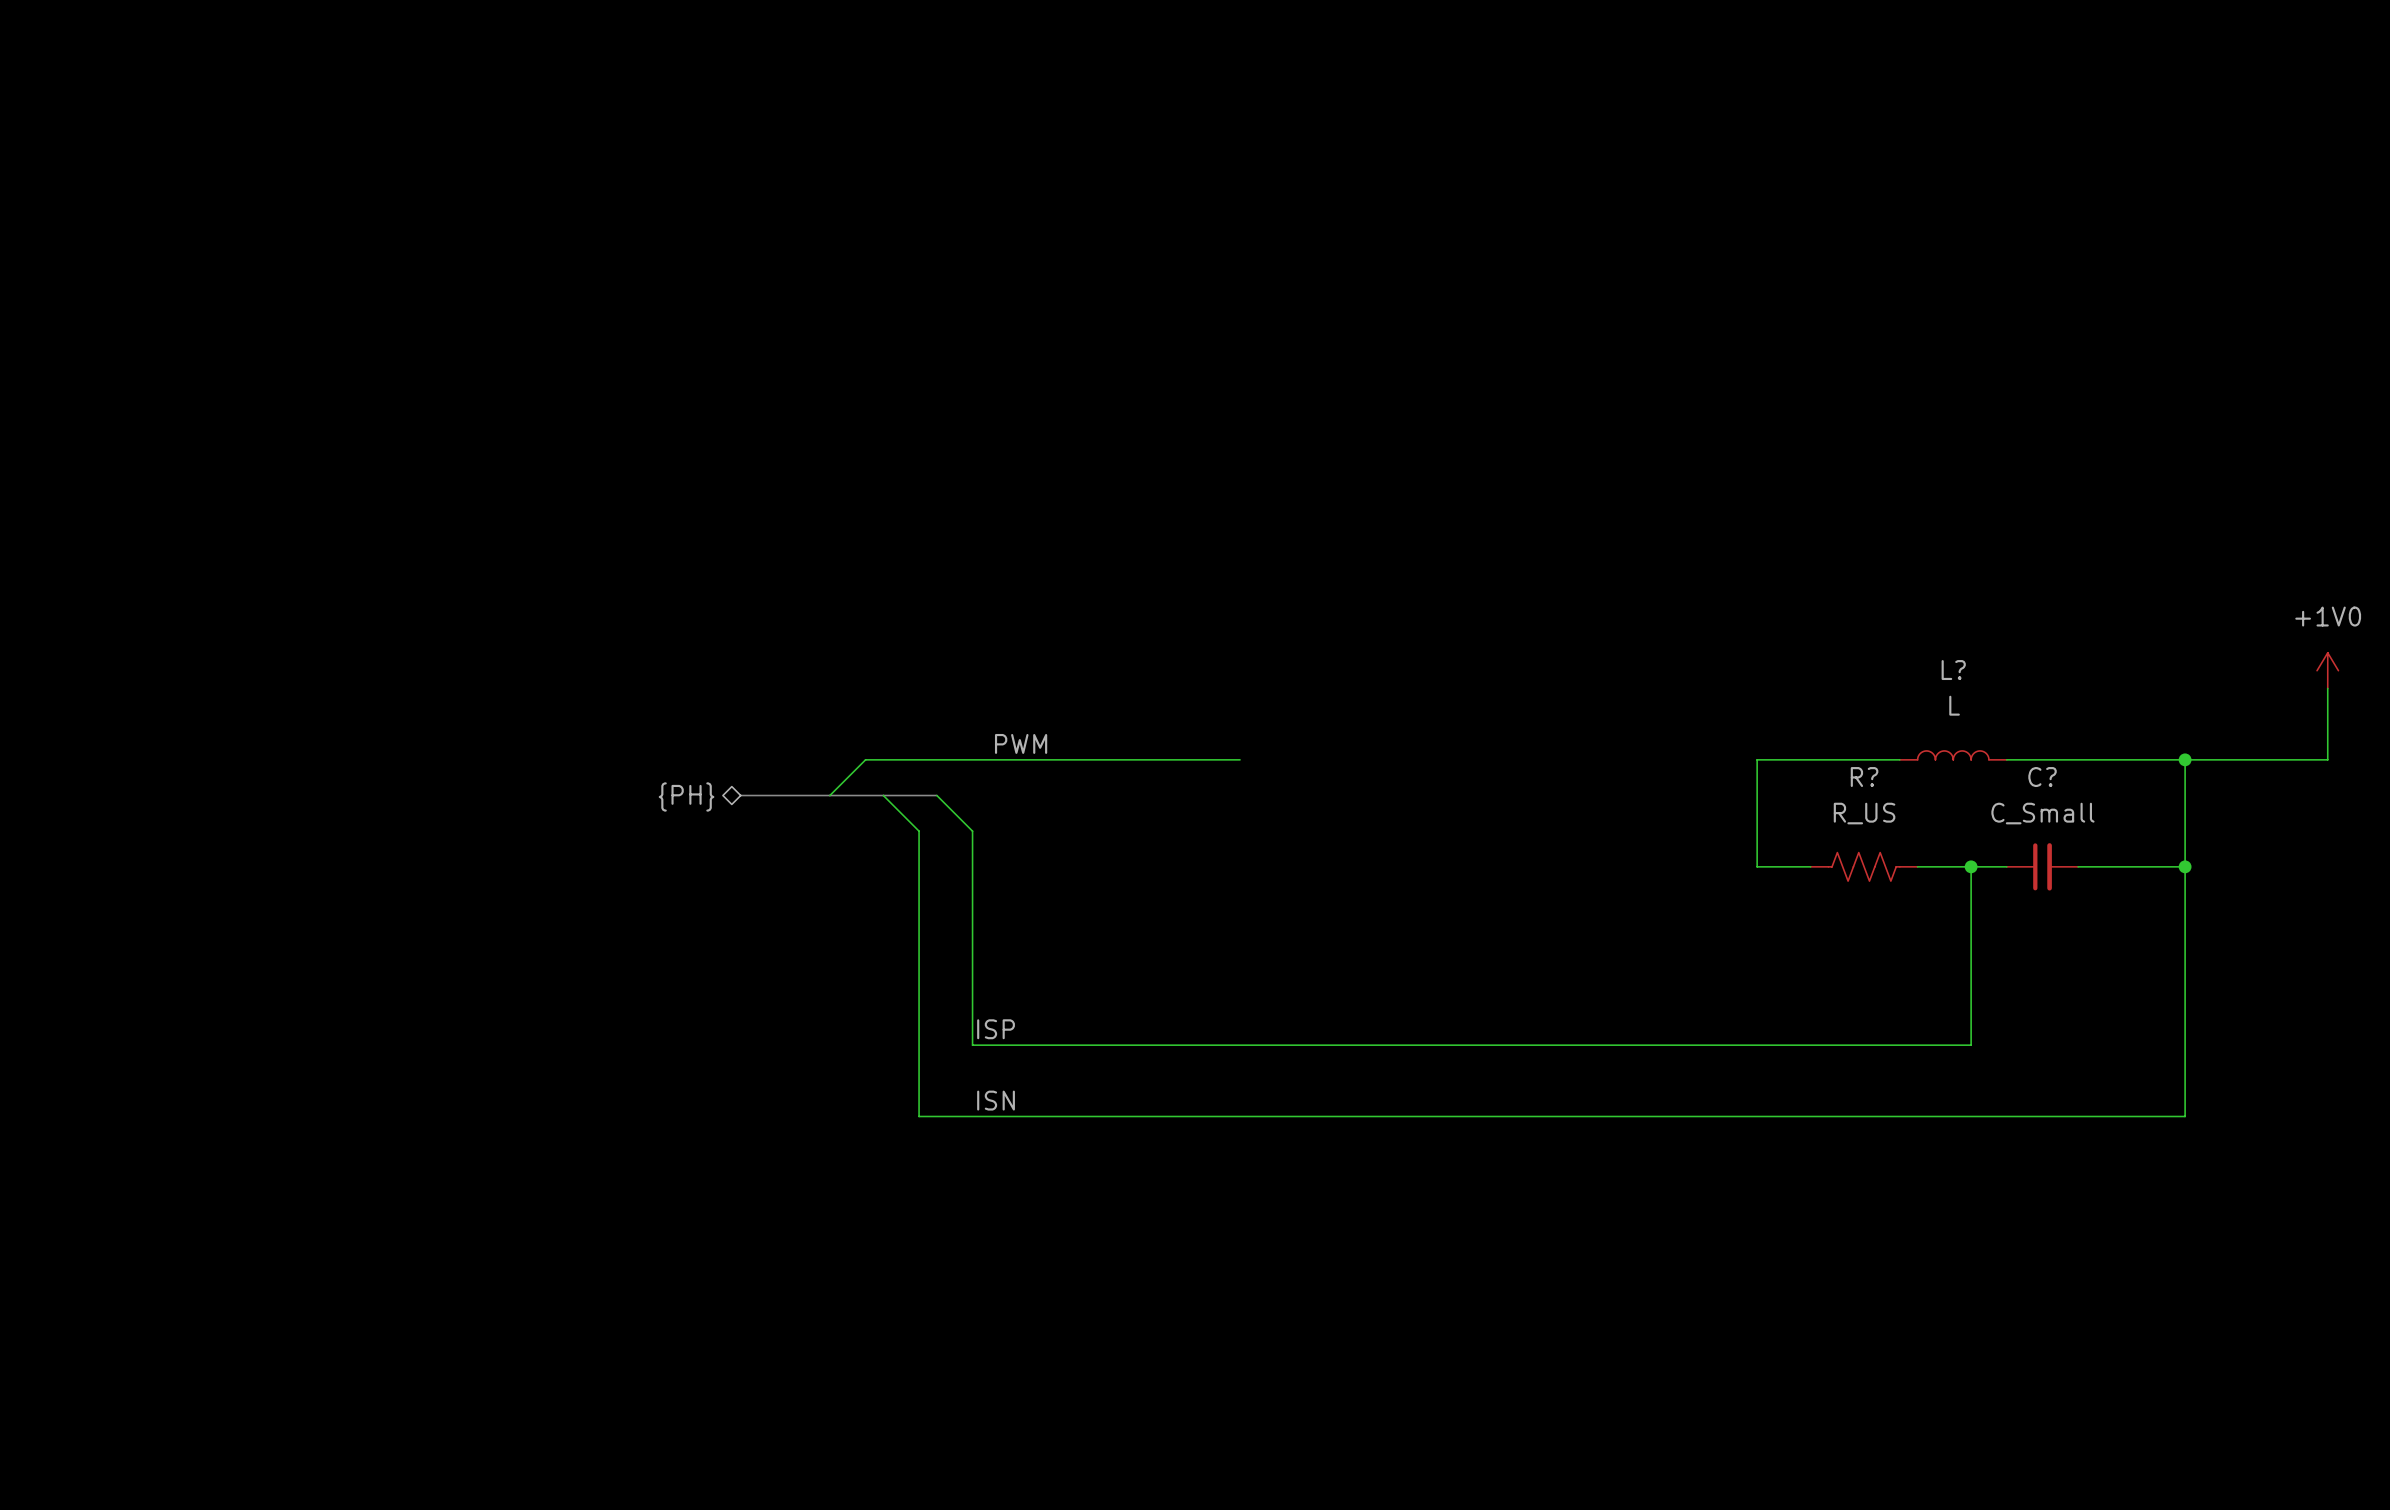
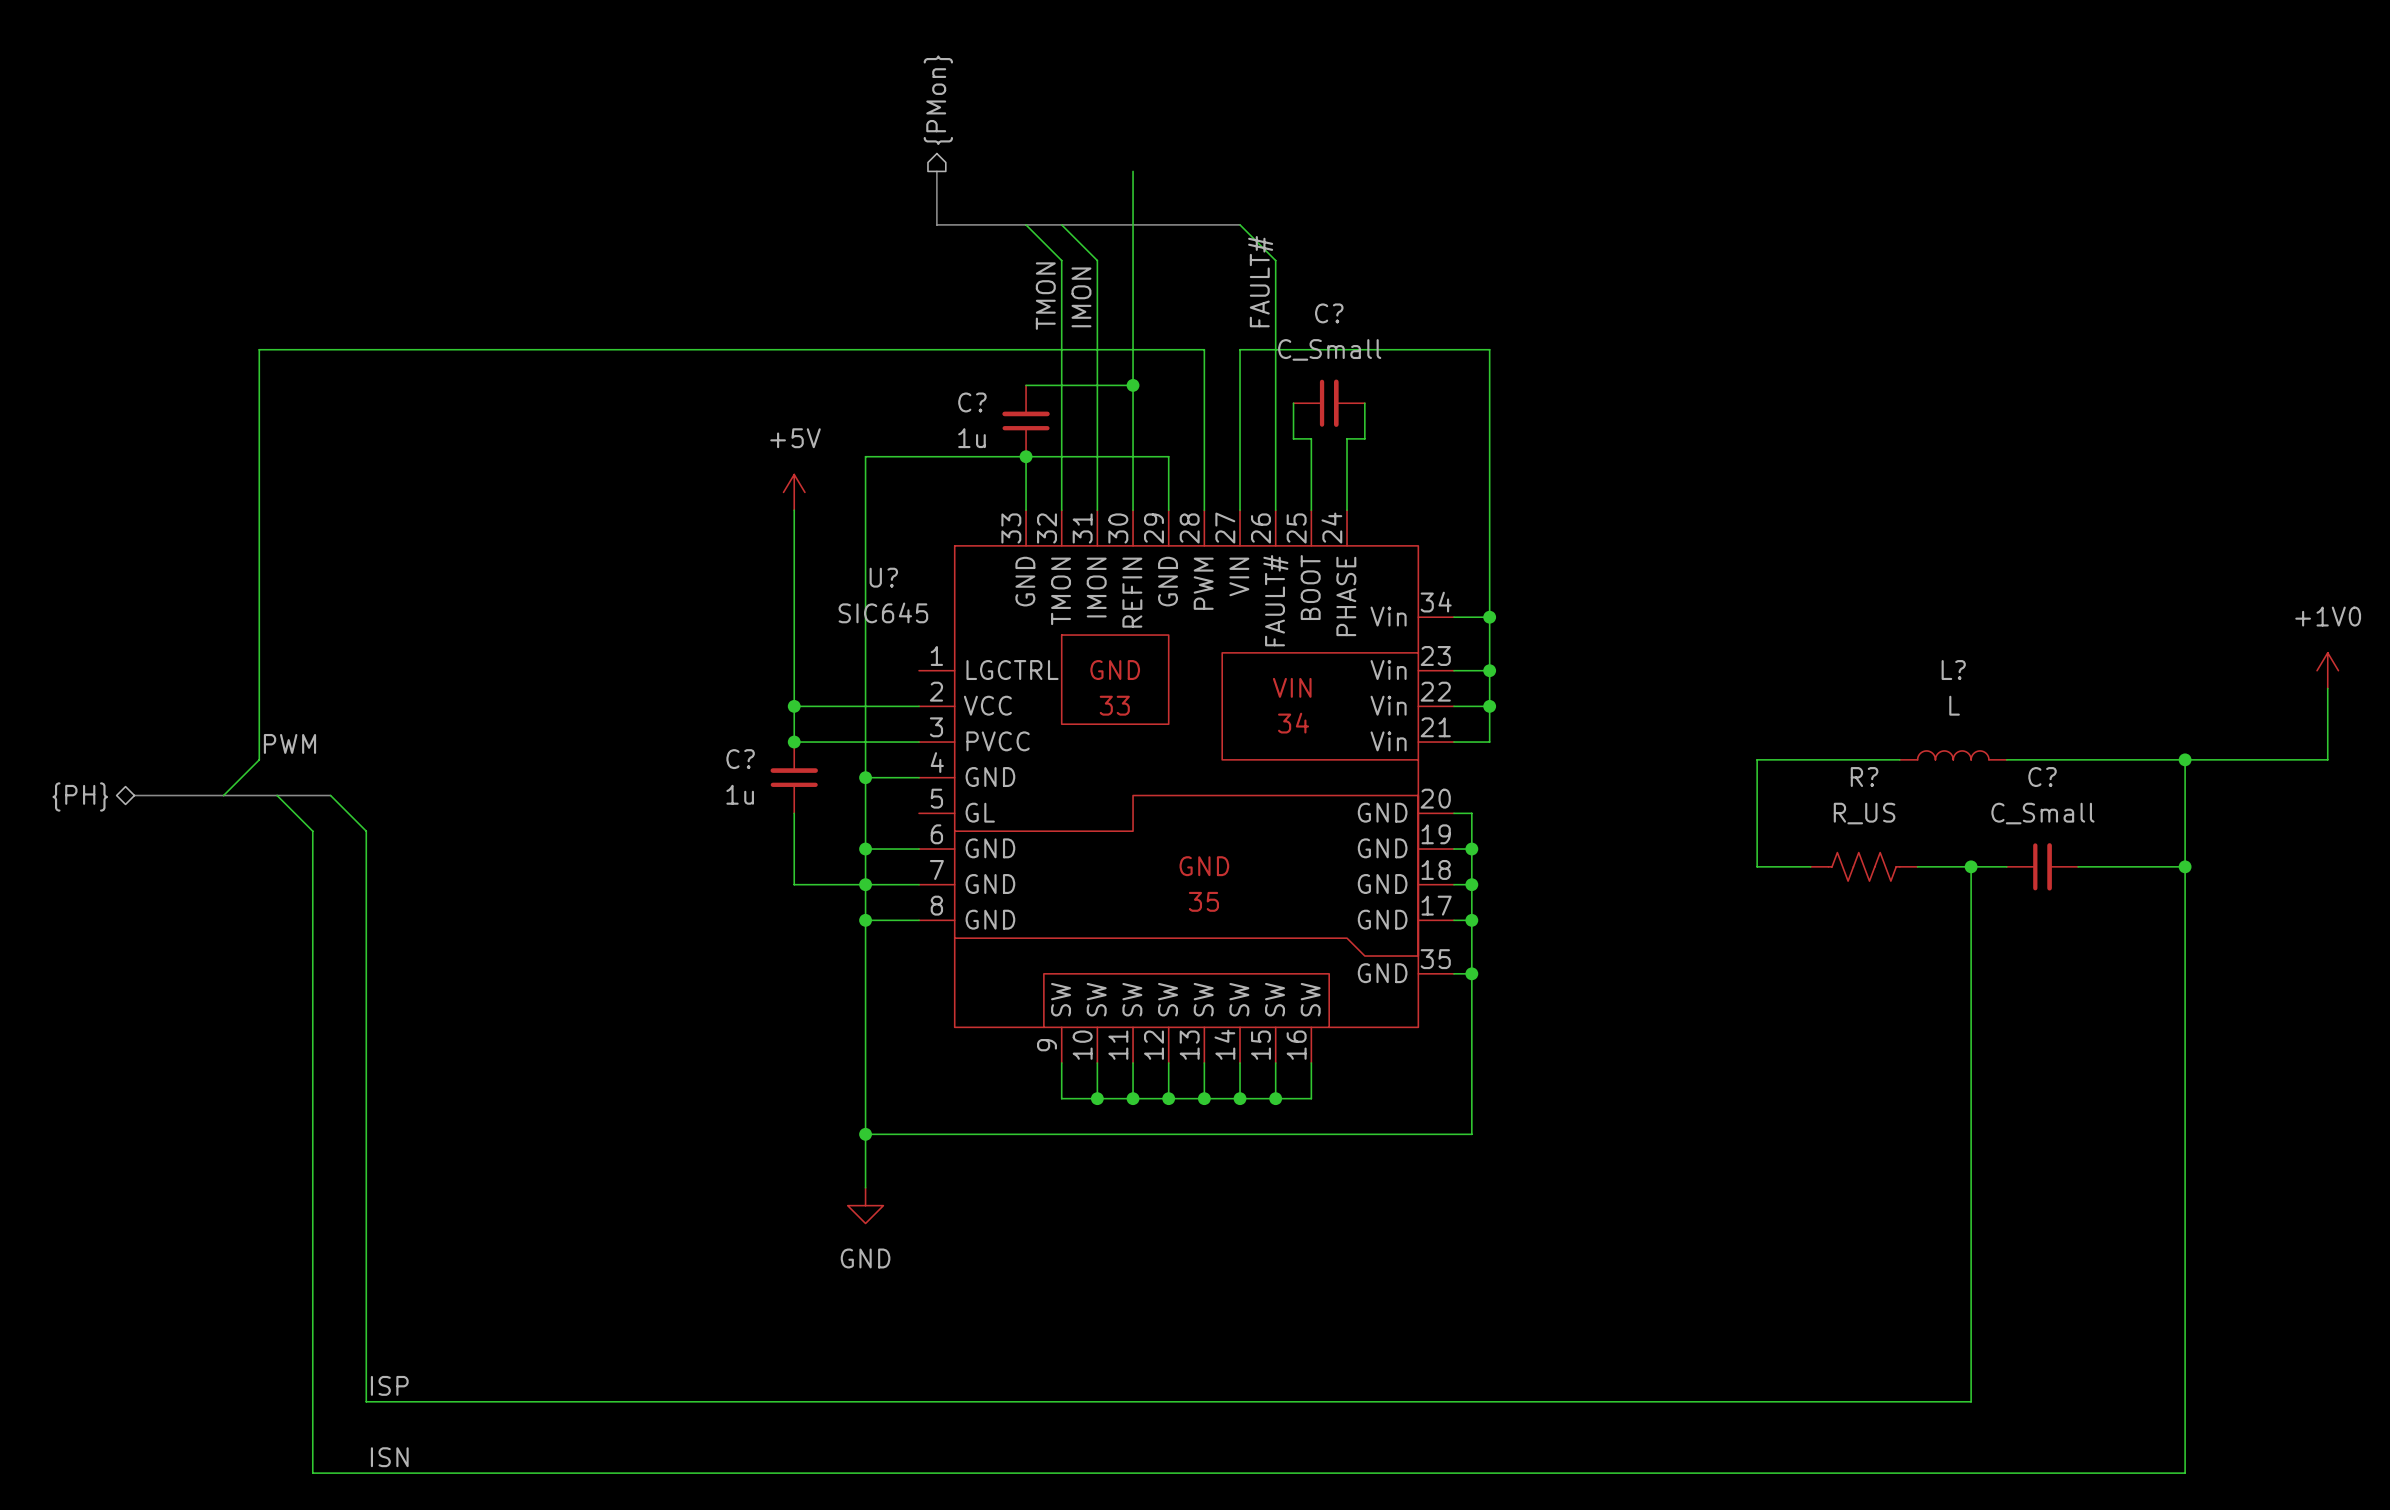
hierarchical label: none -> {PMon} (938, 100)
bus: none -> (936, 171) (936, 224) (1240, 224)
wire: none -> (1133, 171) (1133, 510)
wire: none -> (1026, 224) (1061, 260) (1061, 510)
wire: none -> (1061, 224) (1097, 260) (1097, 510)
wire: none -> (1240, 224) (1275, 260) (1275, 510)
label: none -> FAULT# (1260, 281)
label: none -> TMON (1045, 296)
label: none -> IMON (1081, 297)
wire: none -> (1026, 385) (1133, 385)
junction: none -> (1133, 385)
wire: none -> (1293, 403) (1293, 438) (1311, 438) (1311, 510)
C?: none -> C_Small (1329, 403)
wire: none -> (1364, 403) (1364, 438) (1347, 438) (1347, 510)
C?: none -> 1u (1026, 421)
wire: none -> (1026, 456) (1026, 510)
junction: none -> (1026, 456)
power symbol: none -> +5V (794, 492)
wire: none -> (794, 510) (794, 742) (919, 742)
wire: none -> (1168, 510) (1168, 456) (865, 456) (865, 1187)
wire: none -> (1204, 510) (1204, 349) (259, 349) (259, 759) (223, 795)
wire: none -> (1240, 510) (1240, 349) (1489, 349) (1489, 742) (1454, 742)
wire: none -> (1454, 617) (1489, 617)
junction: none -> (1489, 617)
wire: none -> (1454, 670) (1489, 670)
junction: none -> (1489, 670)
wire: none -> (794, 706) (919, 706)
junction: none -> (794, 706)
wire: none -> (1454, 706) (1489, 706)
junction: none -> (1489, 706)
junction: none -> (794, 742)
label: none -> PWM (289, 743)
label: PWM (1021, 743) -> none
wire: (1240, 759) (865, 759) (829, 795) -> none
C?: none -> 1u (794, 777)
wire: none -> (865, 777) (919, 777)
junction: none -> (865, 777)
U?: none -> SIC645 (1186, 786)
bus: none -> (134, 795) (330, 795)
bus: (740, 795) (936, 795) -> none
wire: (883, 795) (919, 831) (919, 1116) (2185, 1116) -> (277, 795) (312, 831) (312, 1473) (2185, 1473) (2185, 1116)
wire: (936, 795) (972, 831) (972, 1045) (1971, 1045) -> (330, 795) (366, 831) (366, 1401) (1971, 1401) (1971, 1045)
hierarchical label: none -> {PH} (80, 796)
hierarchical label: {PH} (686, 796) -> none
wire: none -> (794, 813) (794, 884) (919, 884)
wire: none -> (1454, 813) (1471, 813) (1471, 1134) (865, 1134)
wire: none -> (865, 849) (919, 849)
junction: none -> (865, 849)
wire: none -> (1454, 849) (1471, 849)
junction: none -> (1471, 849)
junction: none -> (865, 884)
wire: none -> (1454, 884) (1471, 884)
junction: none -> (1471, 884)
wire: none -> (865, 920) (919, 920)
junction: none -> (865, 920)
wire: none -> (1454, 920) (1471, 920)
junction: none -> (1471, 920)
wire: none -> (1454, 973) (1471, 973)
junction: none -> (1471, 973)
label: ISP (996, 1029) -> none
wire: none -> (1061, 1062) (1061, 1098) (1311, 1098) (1311, 1062)
wire: none -> (1097, 1062) (1097, 1098)
wire: none -> (1133, 1062) (1133, 1098)
wire: none -> (1168, 1062) (1168, 1098)
wire: none -> (1204, 1062) (1204, 1098)
wire: none -> (1240, 1062) (1240, 1098)
wire: none -> (1275, 1062) (1275, 1098)
junction: none -> (1097, 1098)
junction: none -> (1133, 1098)
junction: none -> (1168, 1098)
junction: none -> (1204, 1098)
junction: none -> (1240, 1098)
junction: none -> (1275, 1098)
label: ISN (996, 1100) -> none
junction: none -> (865, 1134)
power symbol: none -> GND (865, 1205)
label: none -> ISP (389, 1385)
label: none -> ISN (389, 1457)

